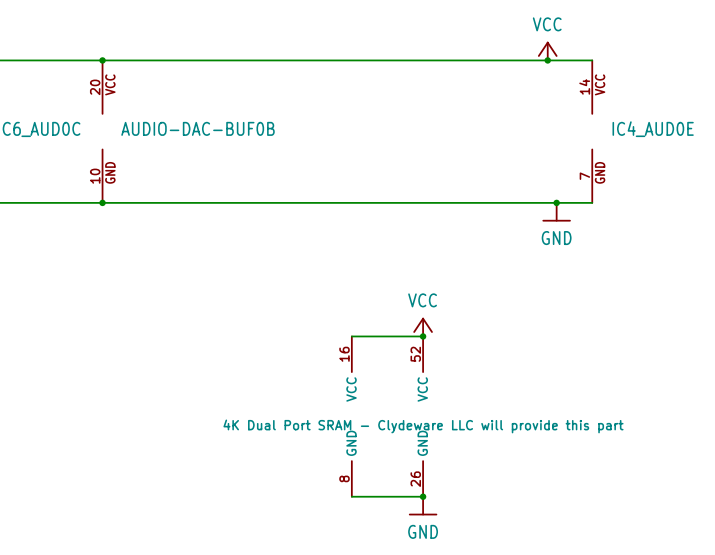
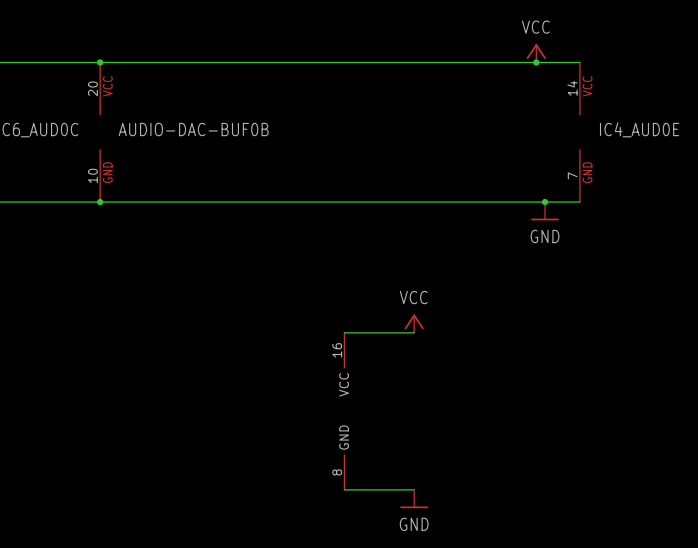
junction: (423, 336) -> none
part: (423, 416) -> none
junction: (423, 496) -> none

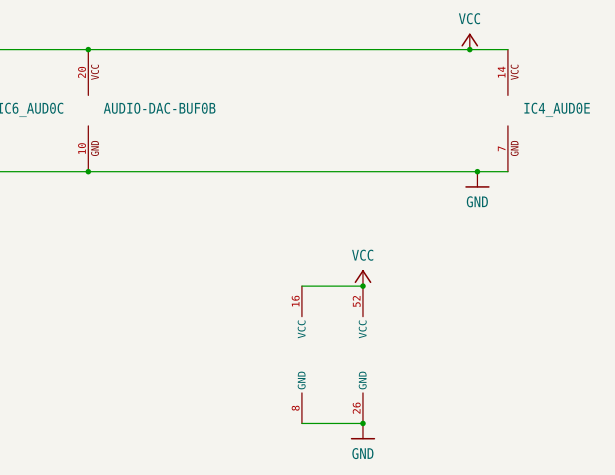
junction: none -> (362, 286)
part: none -> (362, 354)
junction: none -> (362, 423)

